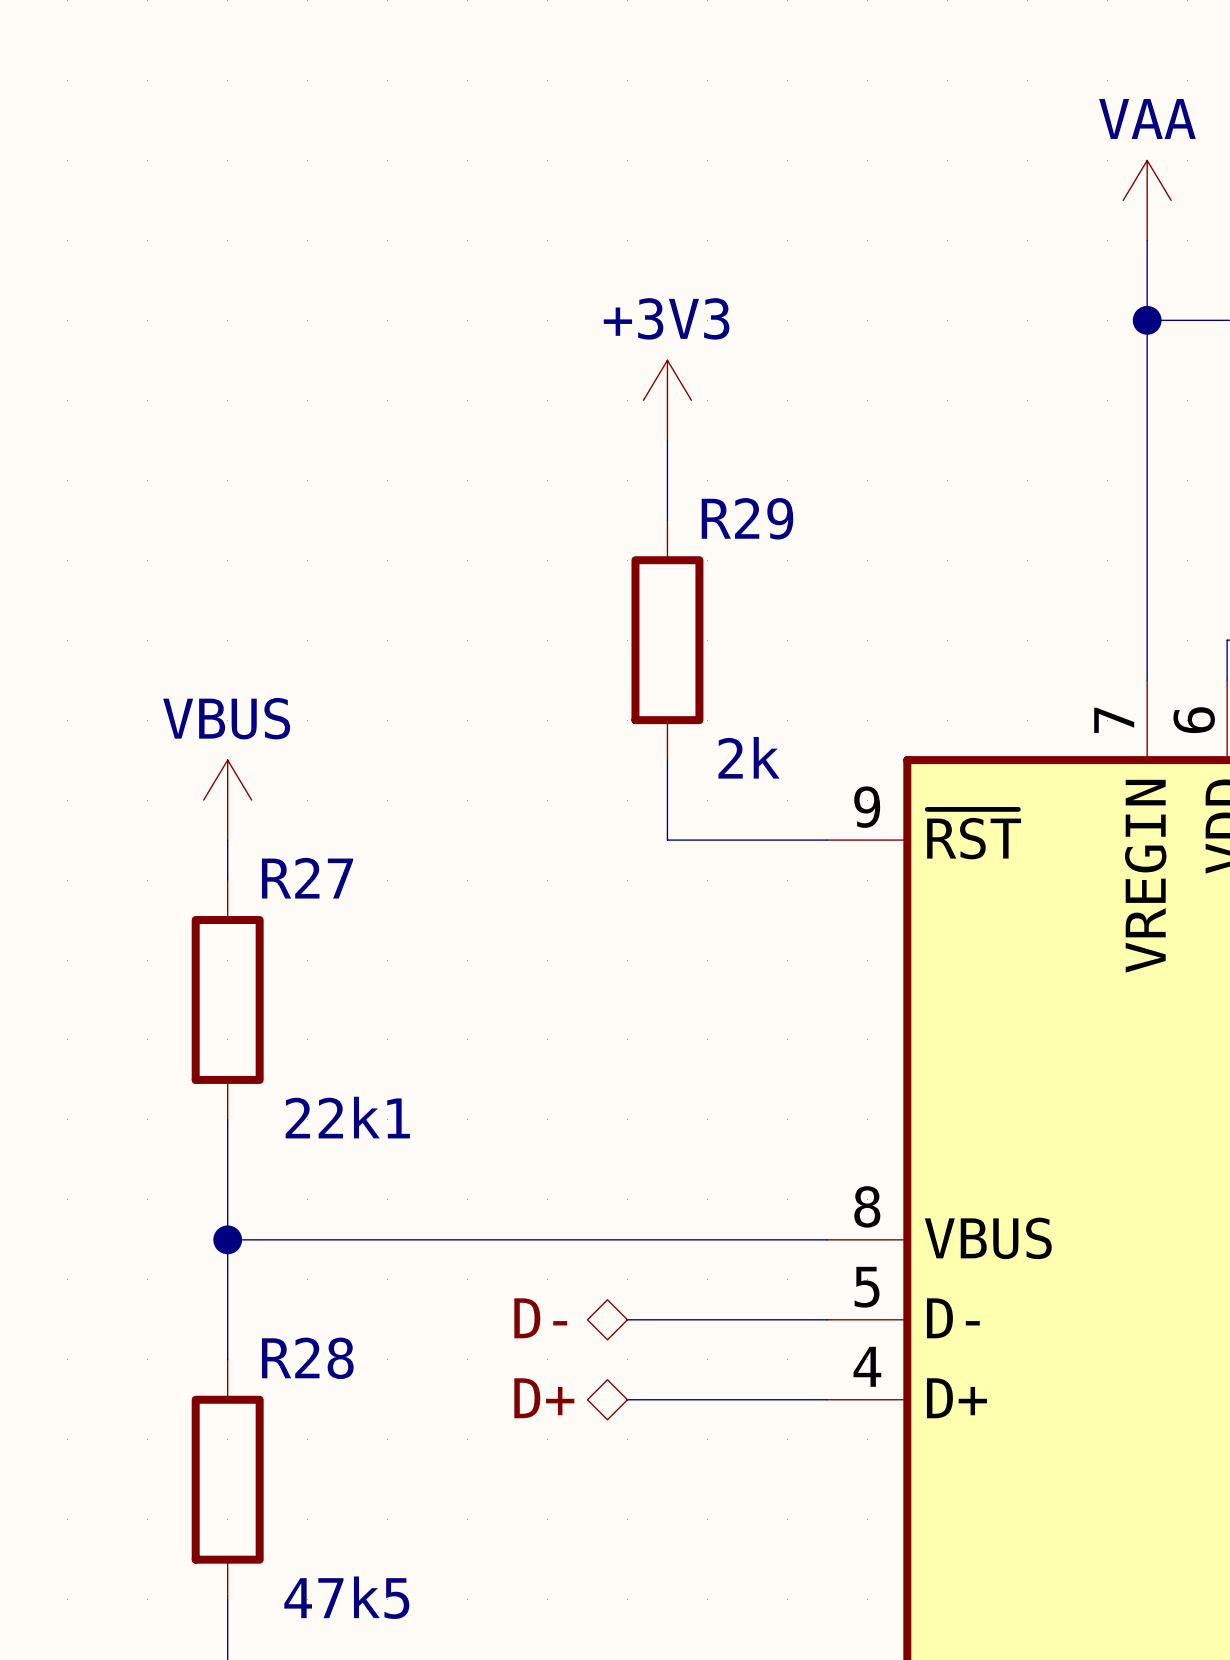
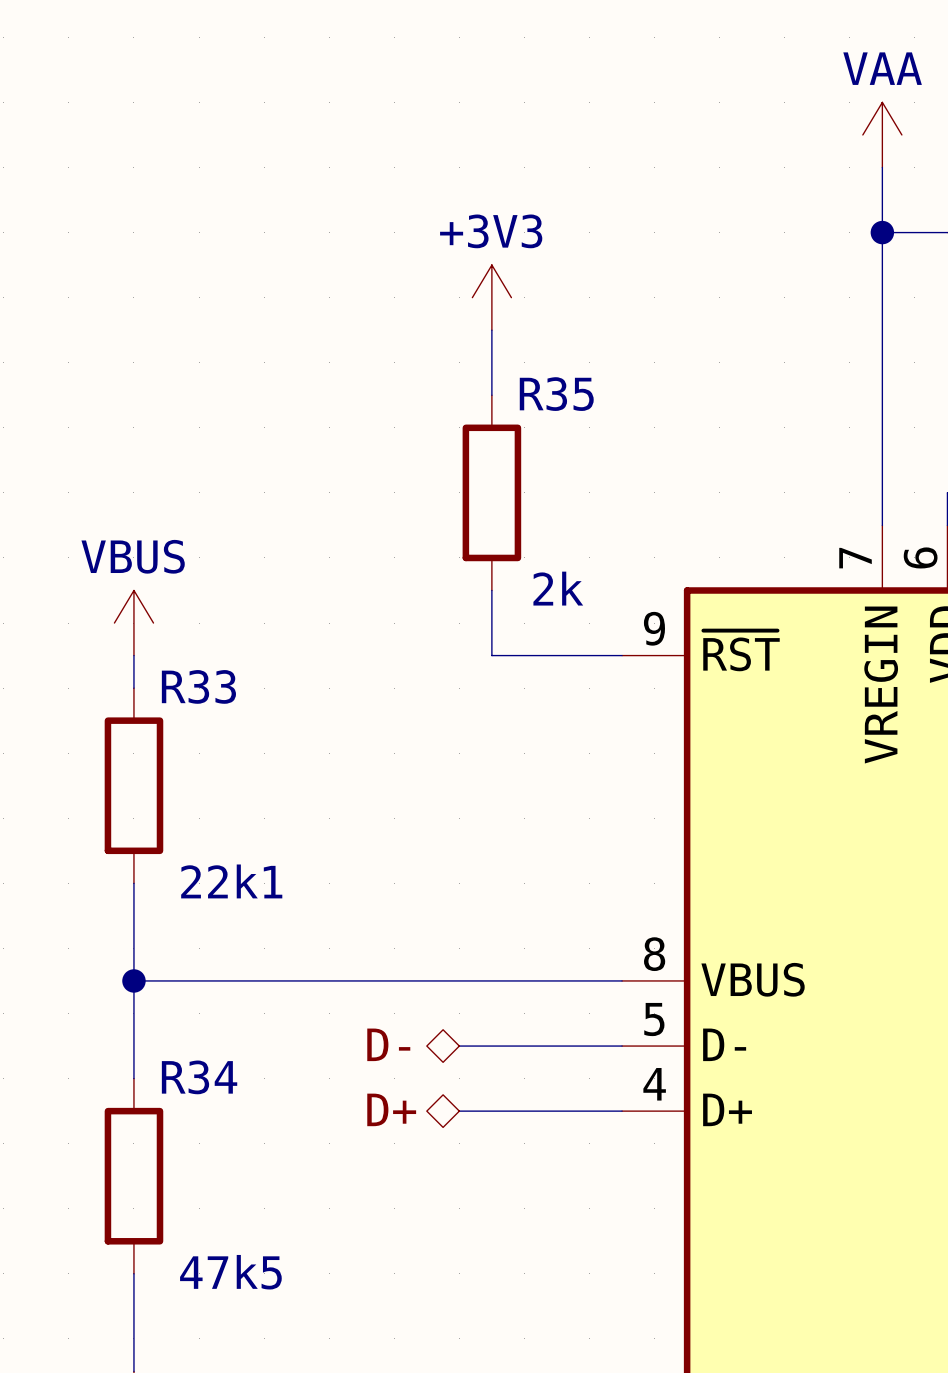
R29 name: R29 (747, 518) -> R35 (556, 394)
R27 name: R27 (307, 878) -> R33 (198, 686)
R28 name: R28 (307, 1358) -> R34 (199, 1077)

